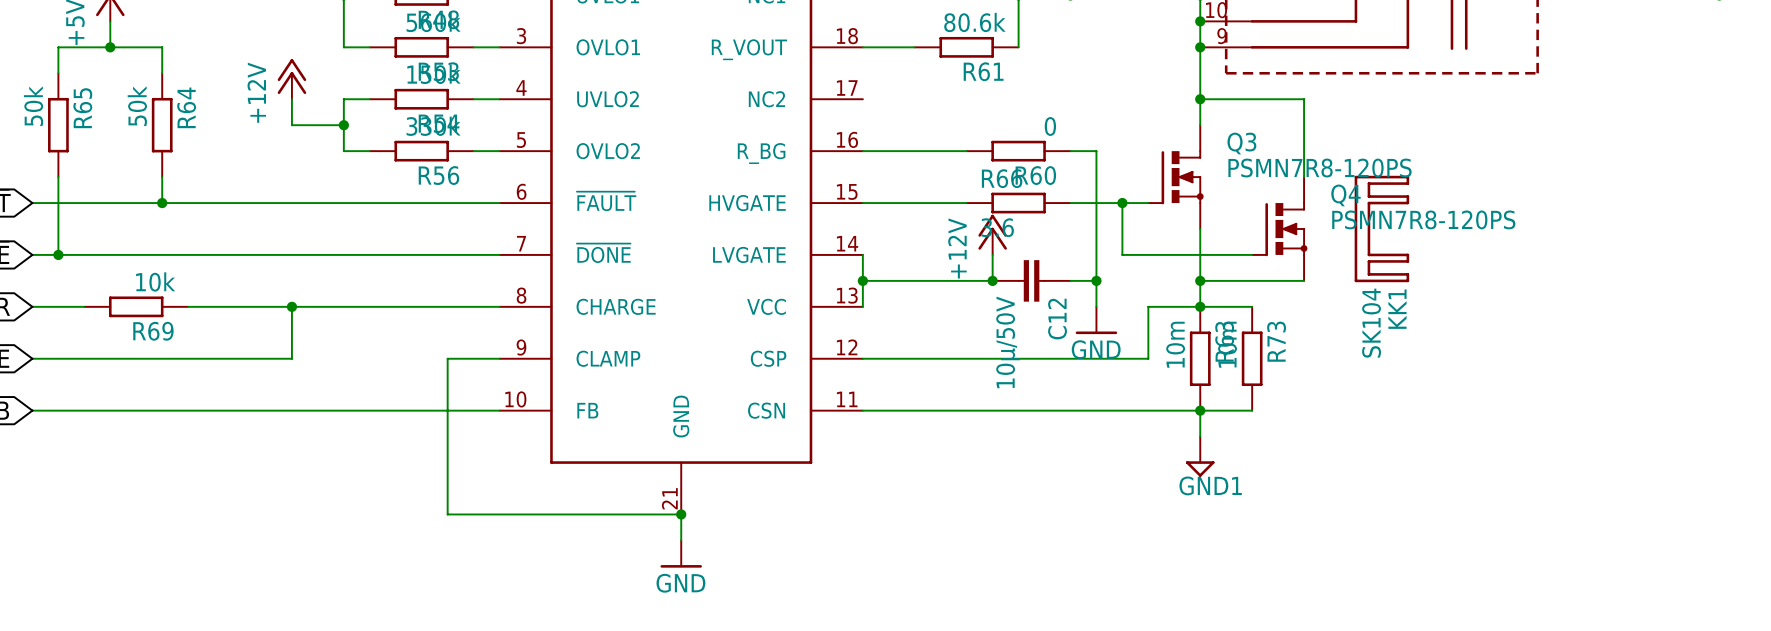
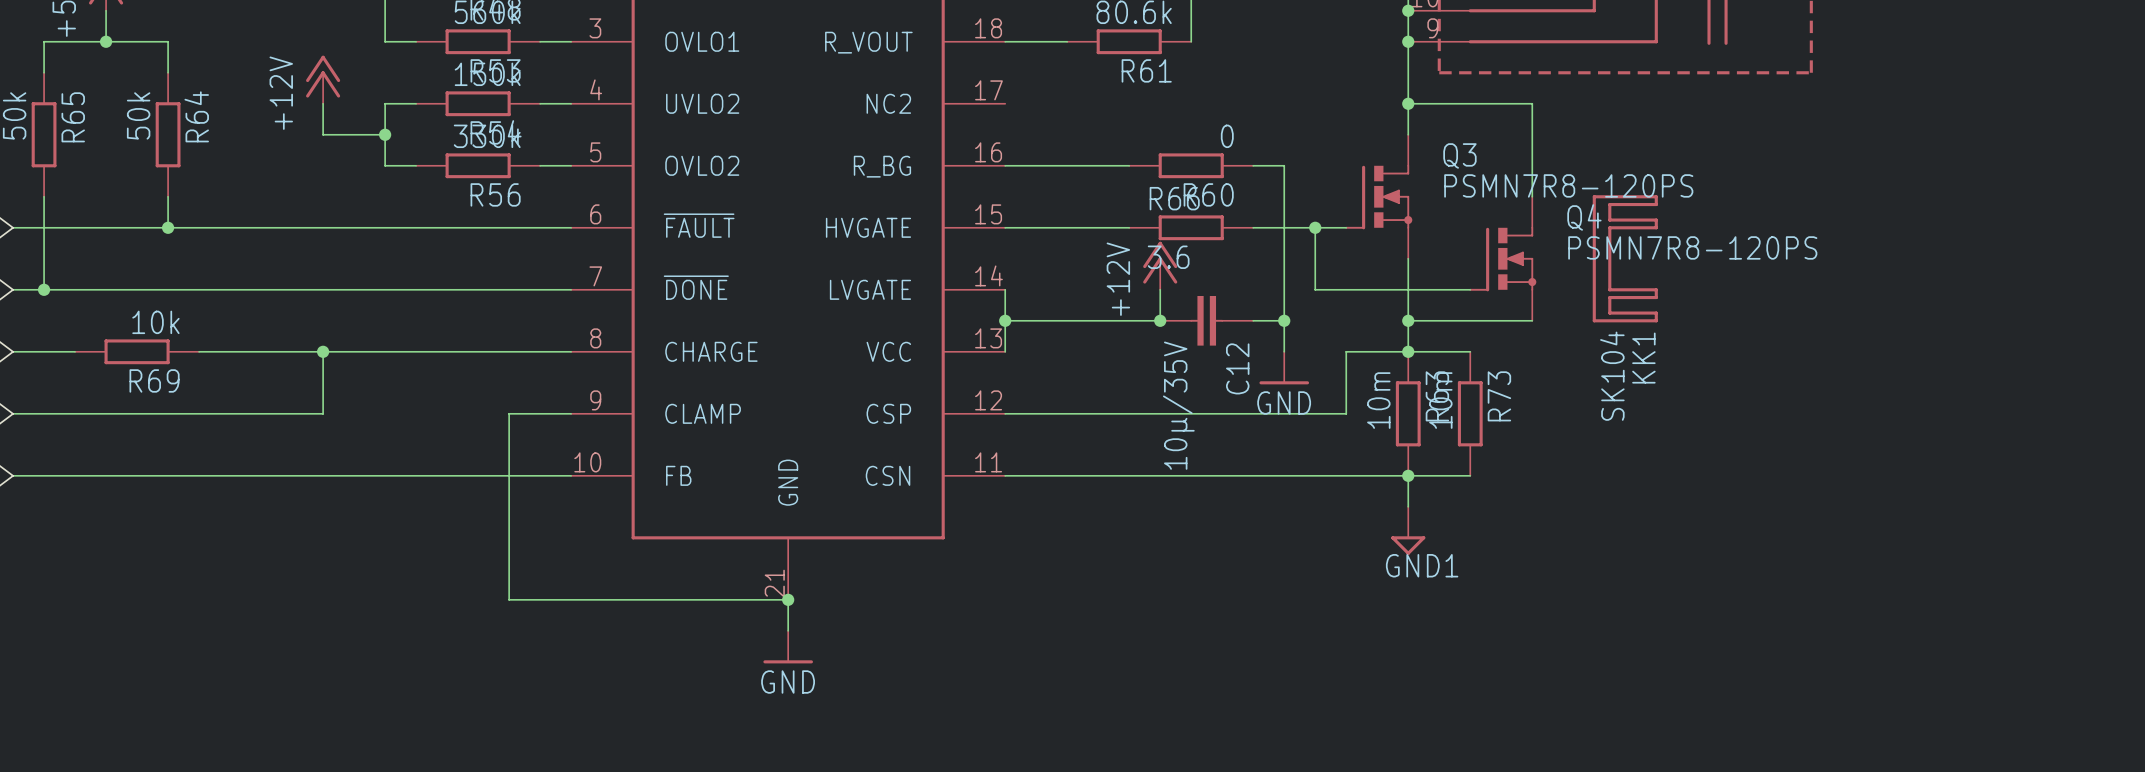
C12 value: 10µ/50V (1008, 342) -> 10µ/35V (1178, 405)

